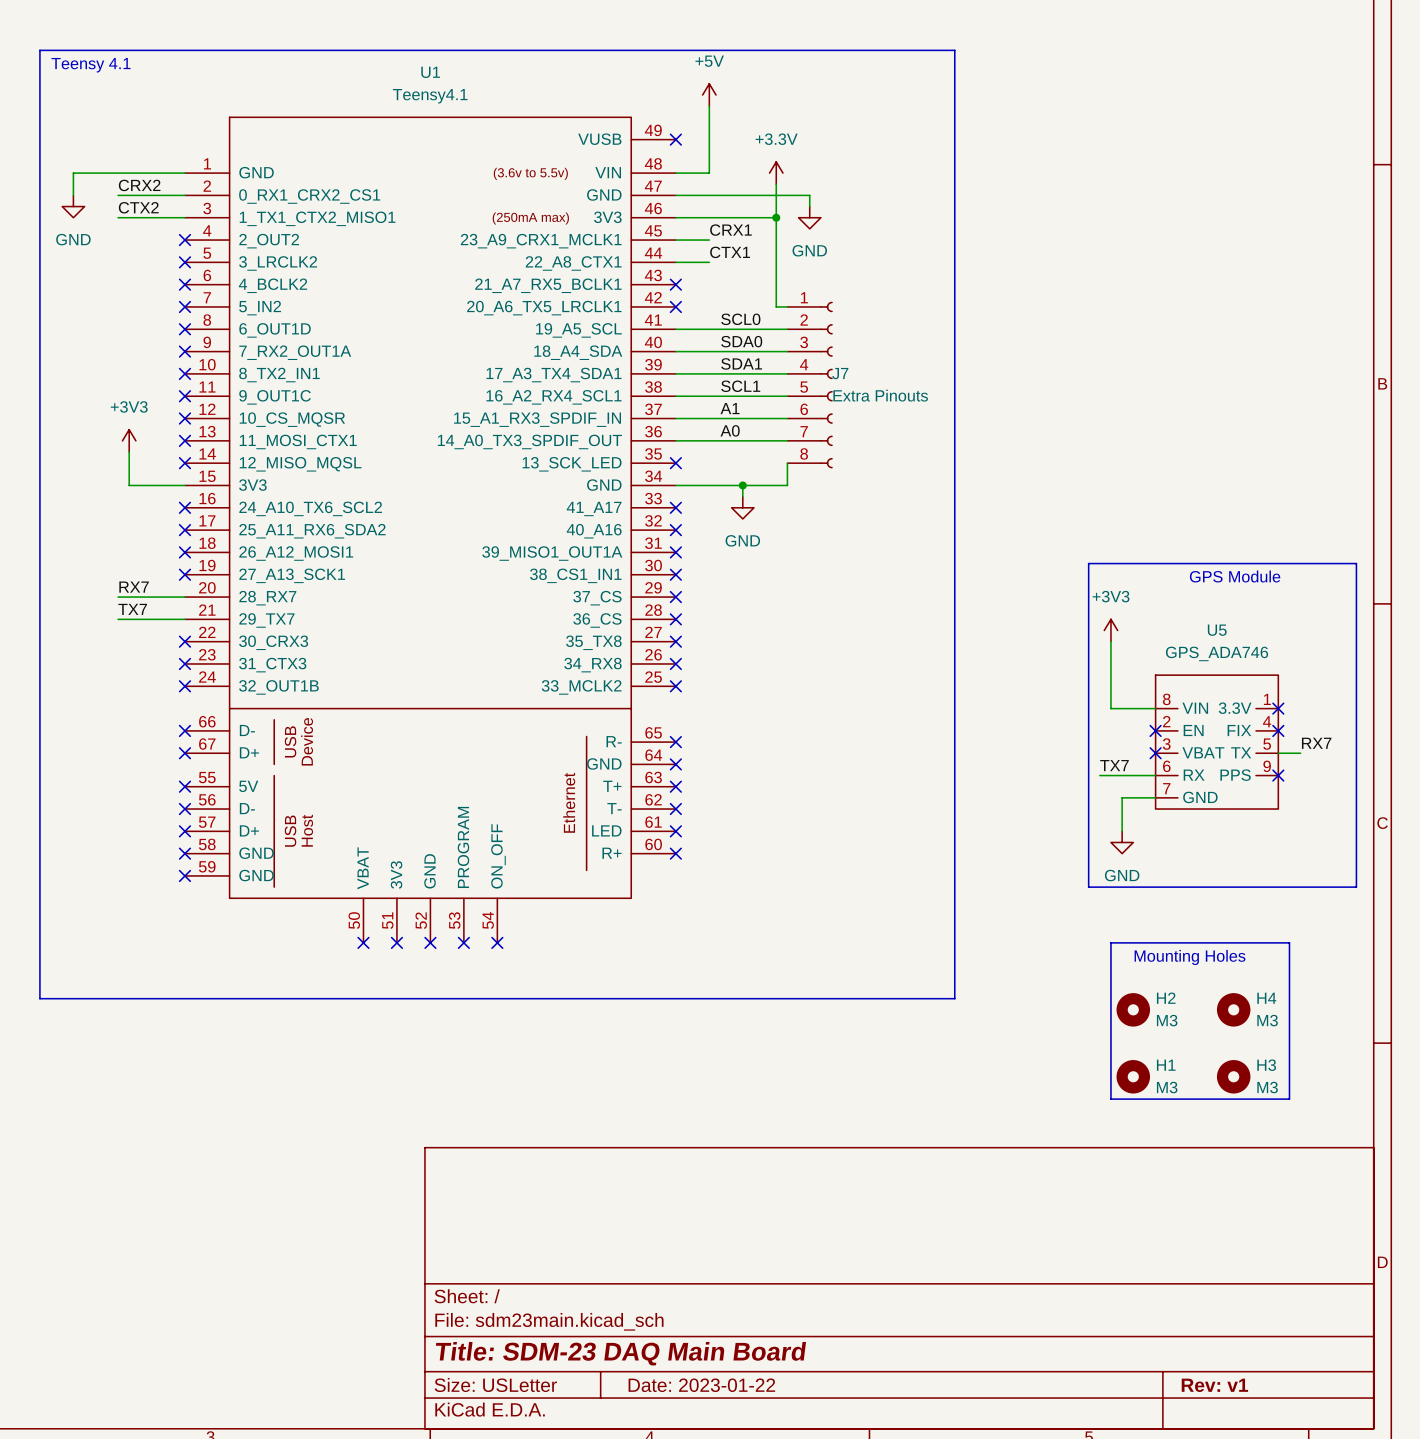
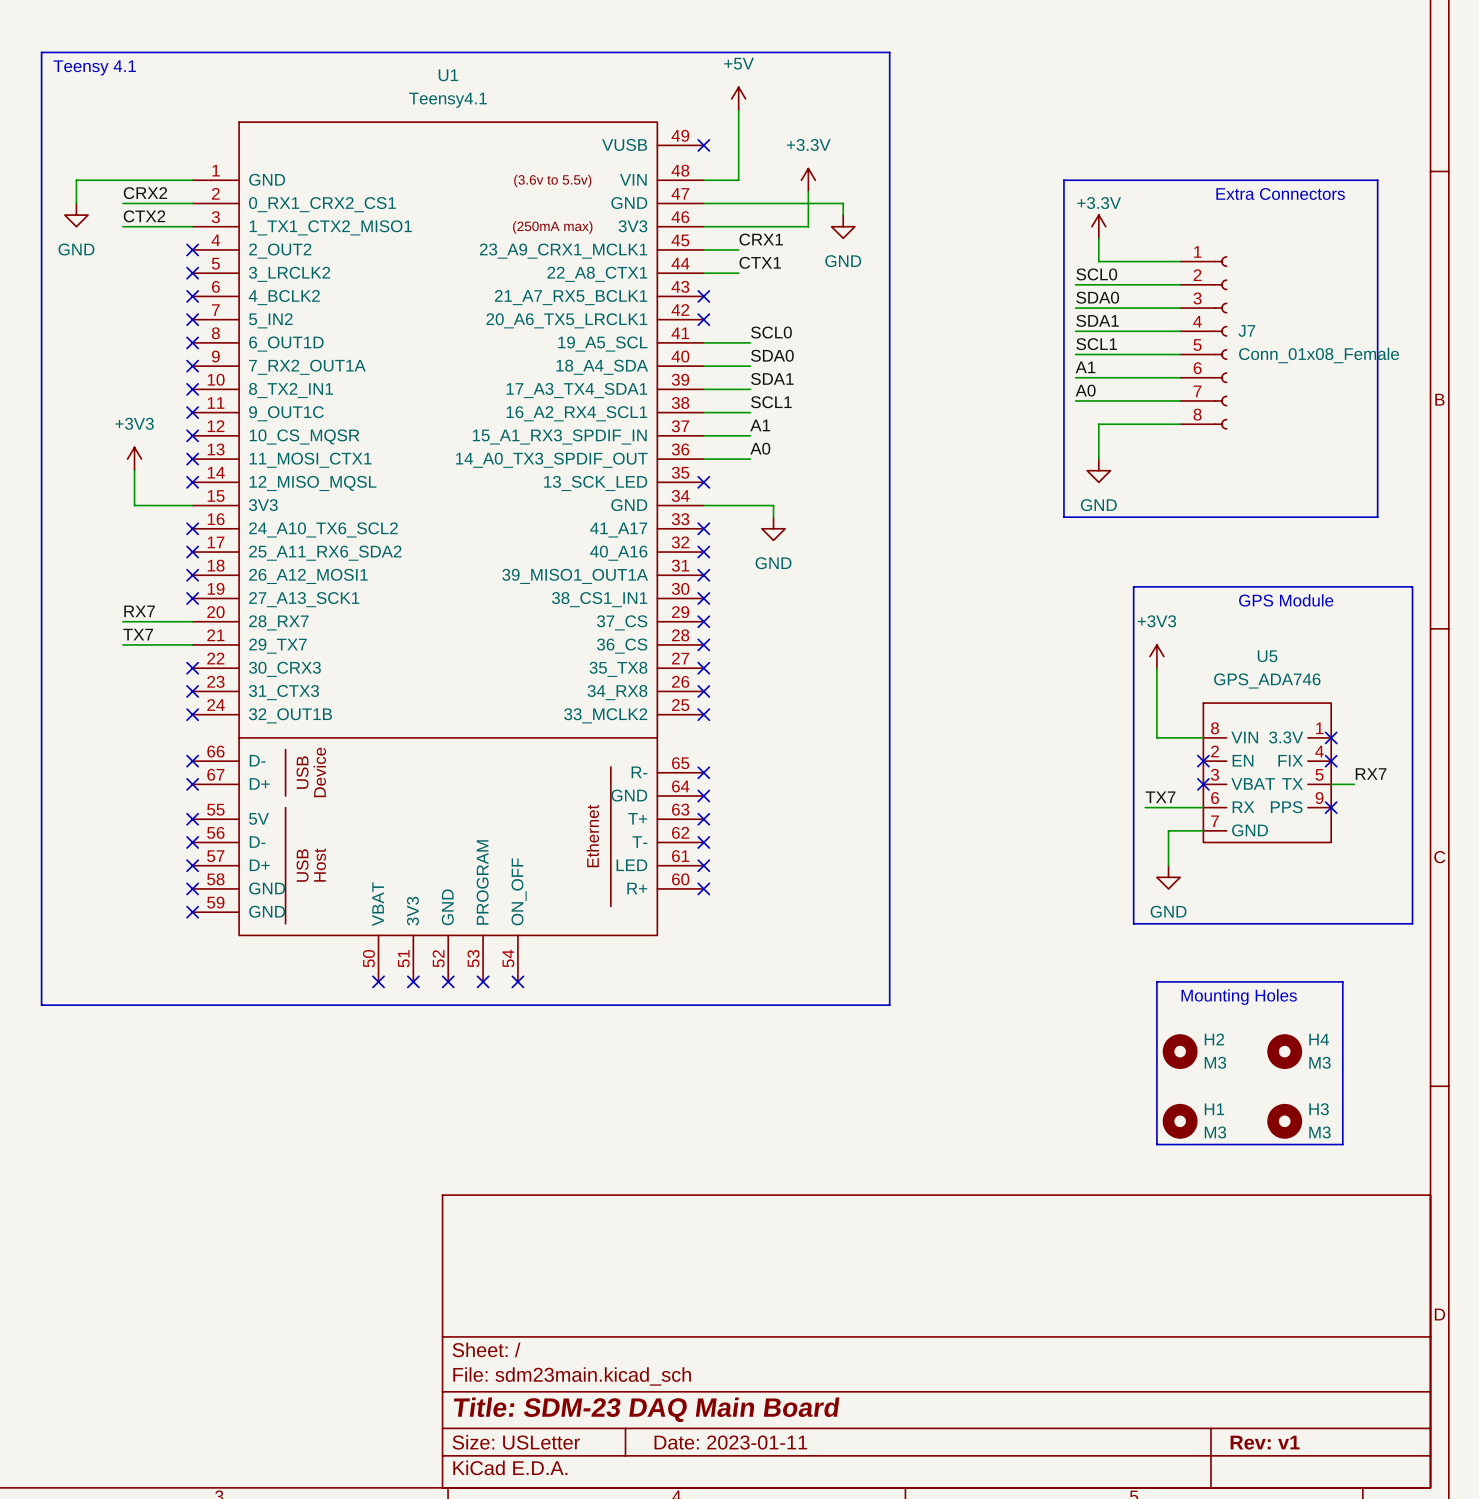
line: (854, 50) (954, 50) (954, 998) (39, 998) (39, 965) -> (889, 52) (889, 1005) (41, 1005)
line: none -> (1063, 180) (1063, 517) (1377, 517) (1377, 180) (1063, 180)
text: none -> Extra Connectors (1280, 193)
wire: (776, 217) (776, 306) (787, 306) -> none
junction: (776, 217) -> none
power symbol: none -> +3.3V (1098, 226)
wire: none -> (1098, 238) (1098, 261) (1180, 261)
label: none -> SCL0 (1096, 274)
wire: none -> (1075, 284) (1180, 284)
label: none -> SDA0 (1097, 297)
wire: none -> (1075, 308) (1180, 308)
label: none -> SDA1 (1097, 320)
wire: none -> (1075, 331) (1180, 331)
wire: (720, 329) (787, 329) -> none
label: none -> SCL1 (1096, 344)
wire: none -> (1075, 354) (1180, 354)
wire: (720, 351) (787, 351) -> none
label: none -> A1 (1085, 367)
wire: none -> (1075, 377) (1180, 377)
wire: (720, 373) (787, 373) -> none
J7 name position: J7 (840, 373) -> J7 (1246, 330)
label: none -> A0 (1085, 390)
J7 position: (810, 385) -> (1203, 342)
wire: none -> (1075, 400) (1180, 400)
J7 value: Extra Pinouts (880, 395) -> Conn_01x08_Female (1319, 355)
wire: (720, 396) (787, 396) -> none
wire: none -> (1180, 424) (1098, 424) (1098, 459)
wire: (720, 418) (787, 418) -> none
wire: (720, 440) (787, 440) -> none
power symbol: none -> GND (1098, 470)
wire: (787, 463) (787, 485) (742, 485) -> none
junction: (742, 485) -> none
title block: Date: 2023-01-22 (701, 1385) -> Date: 2023-01-11 (730, 1442)

